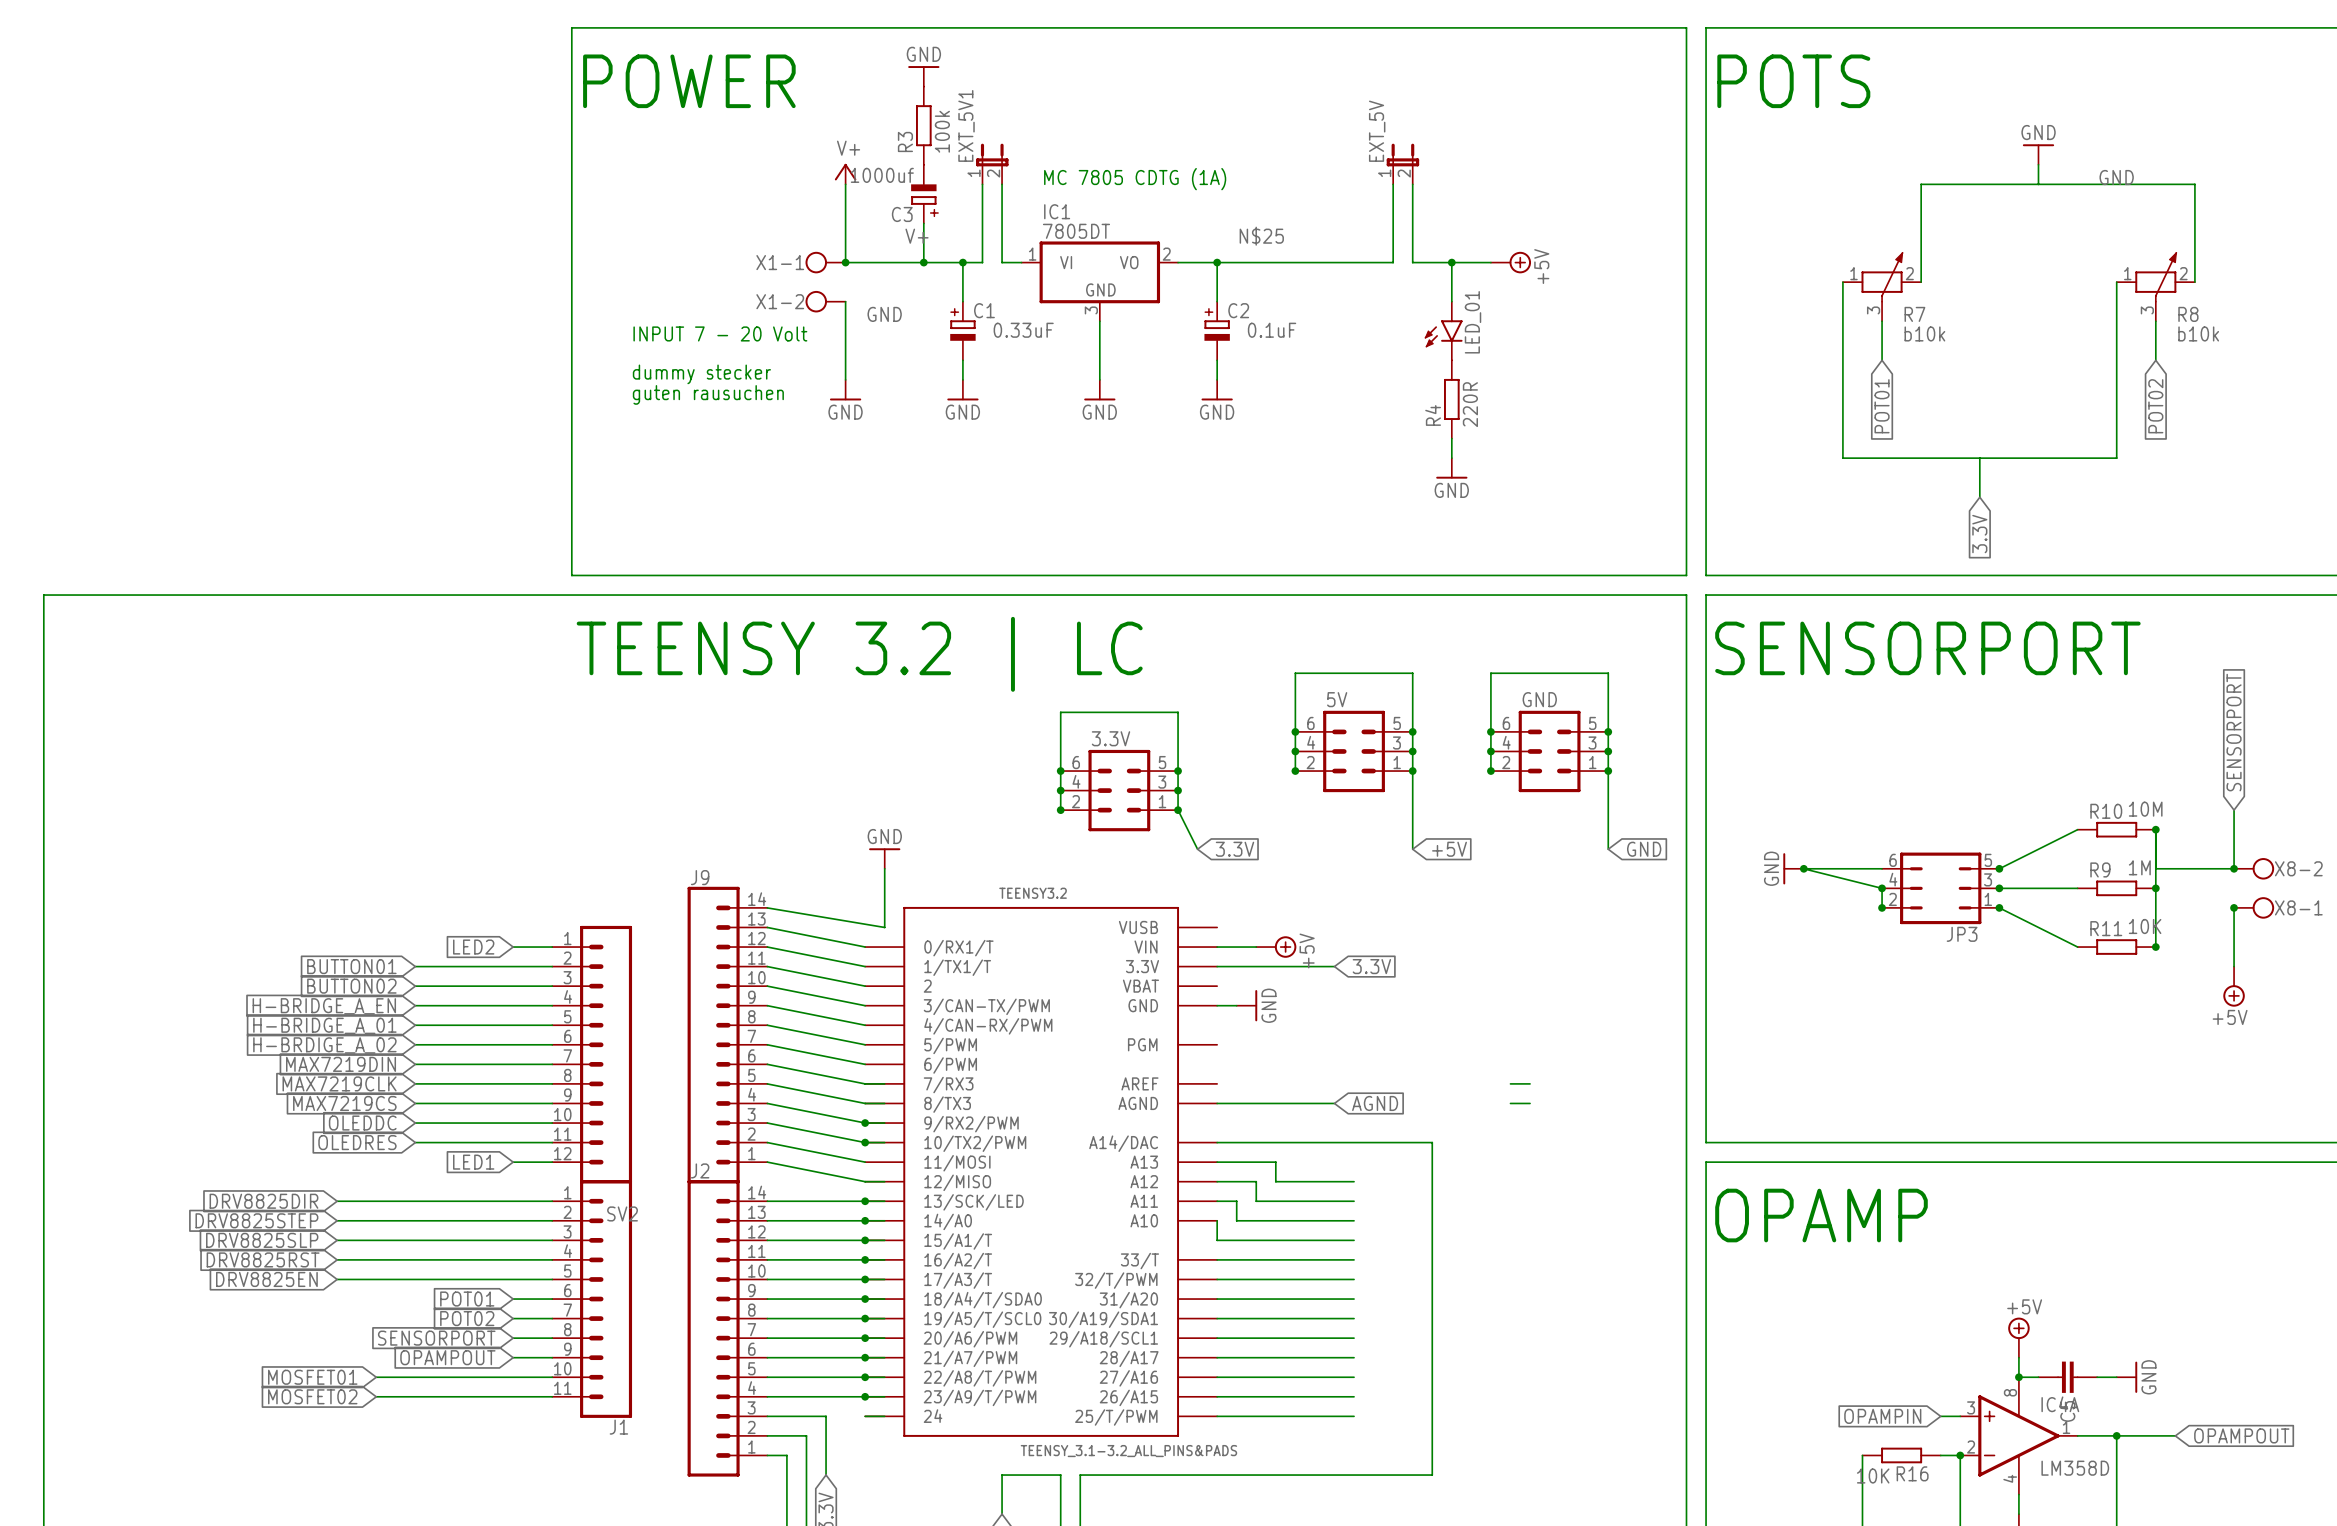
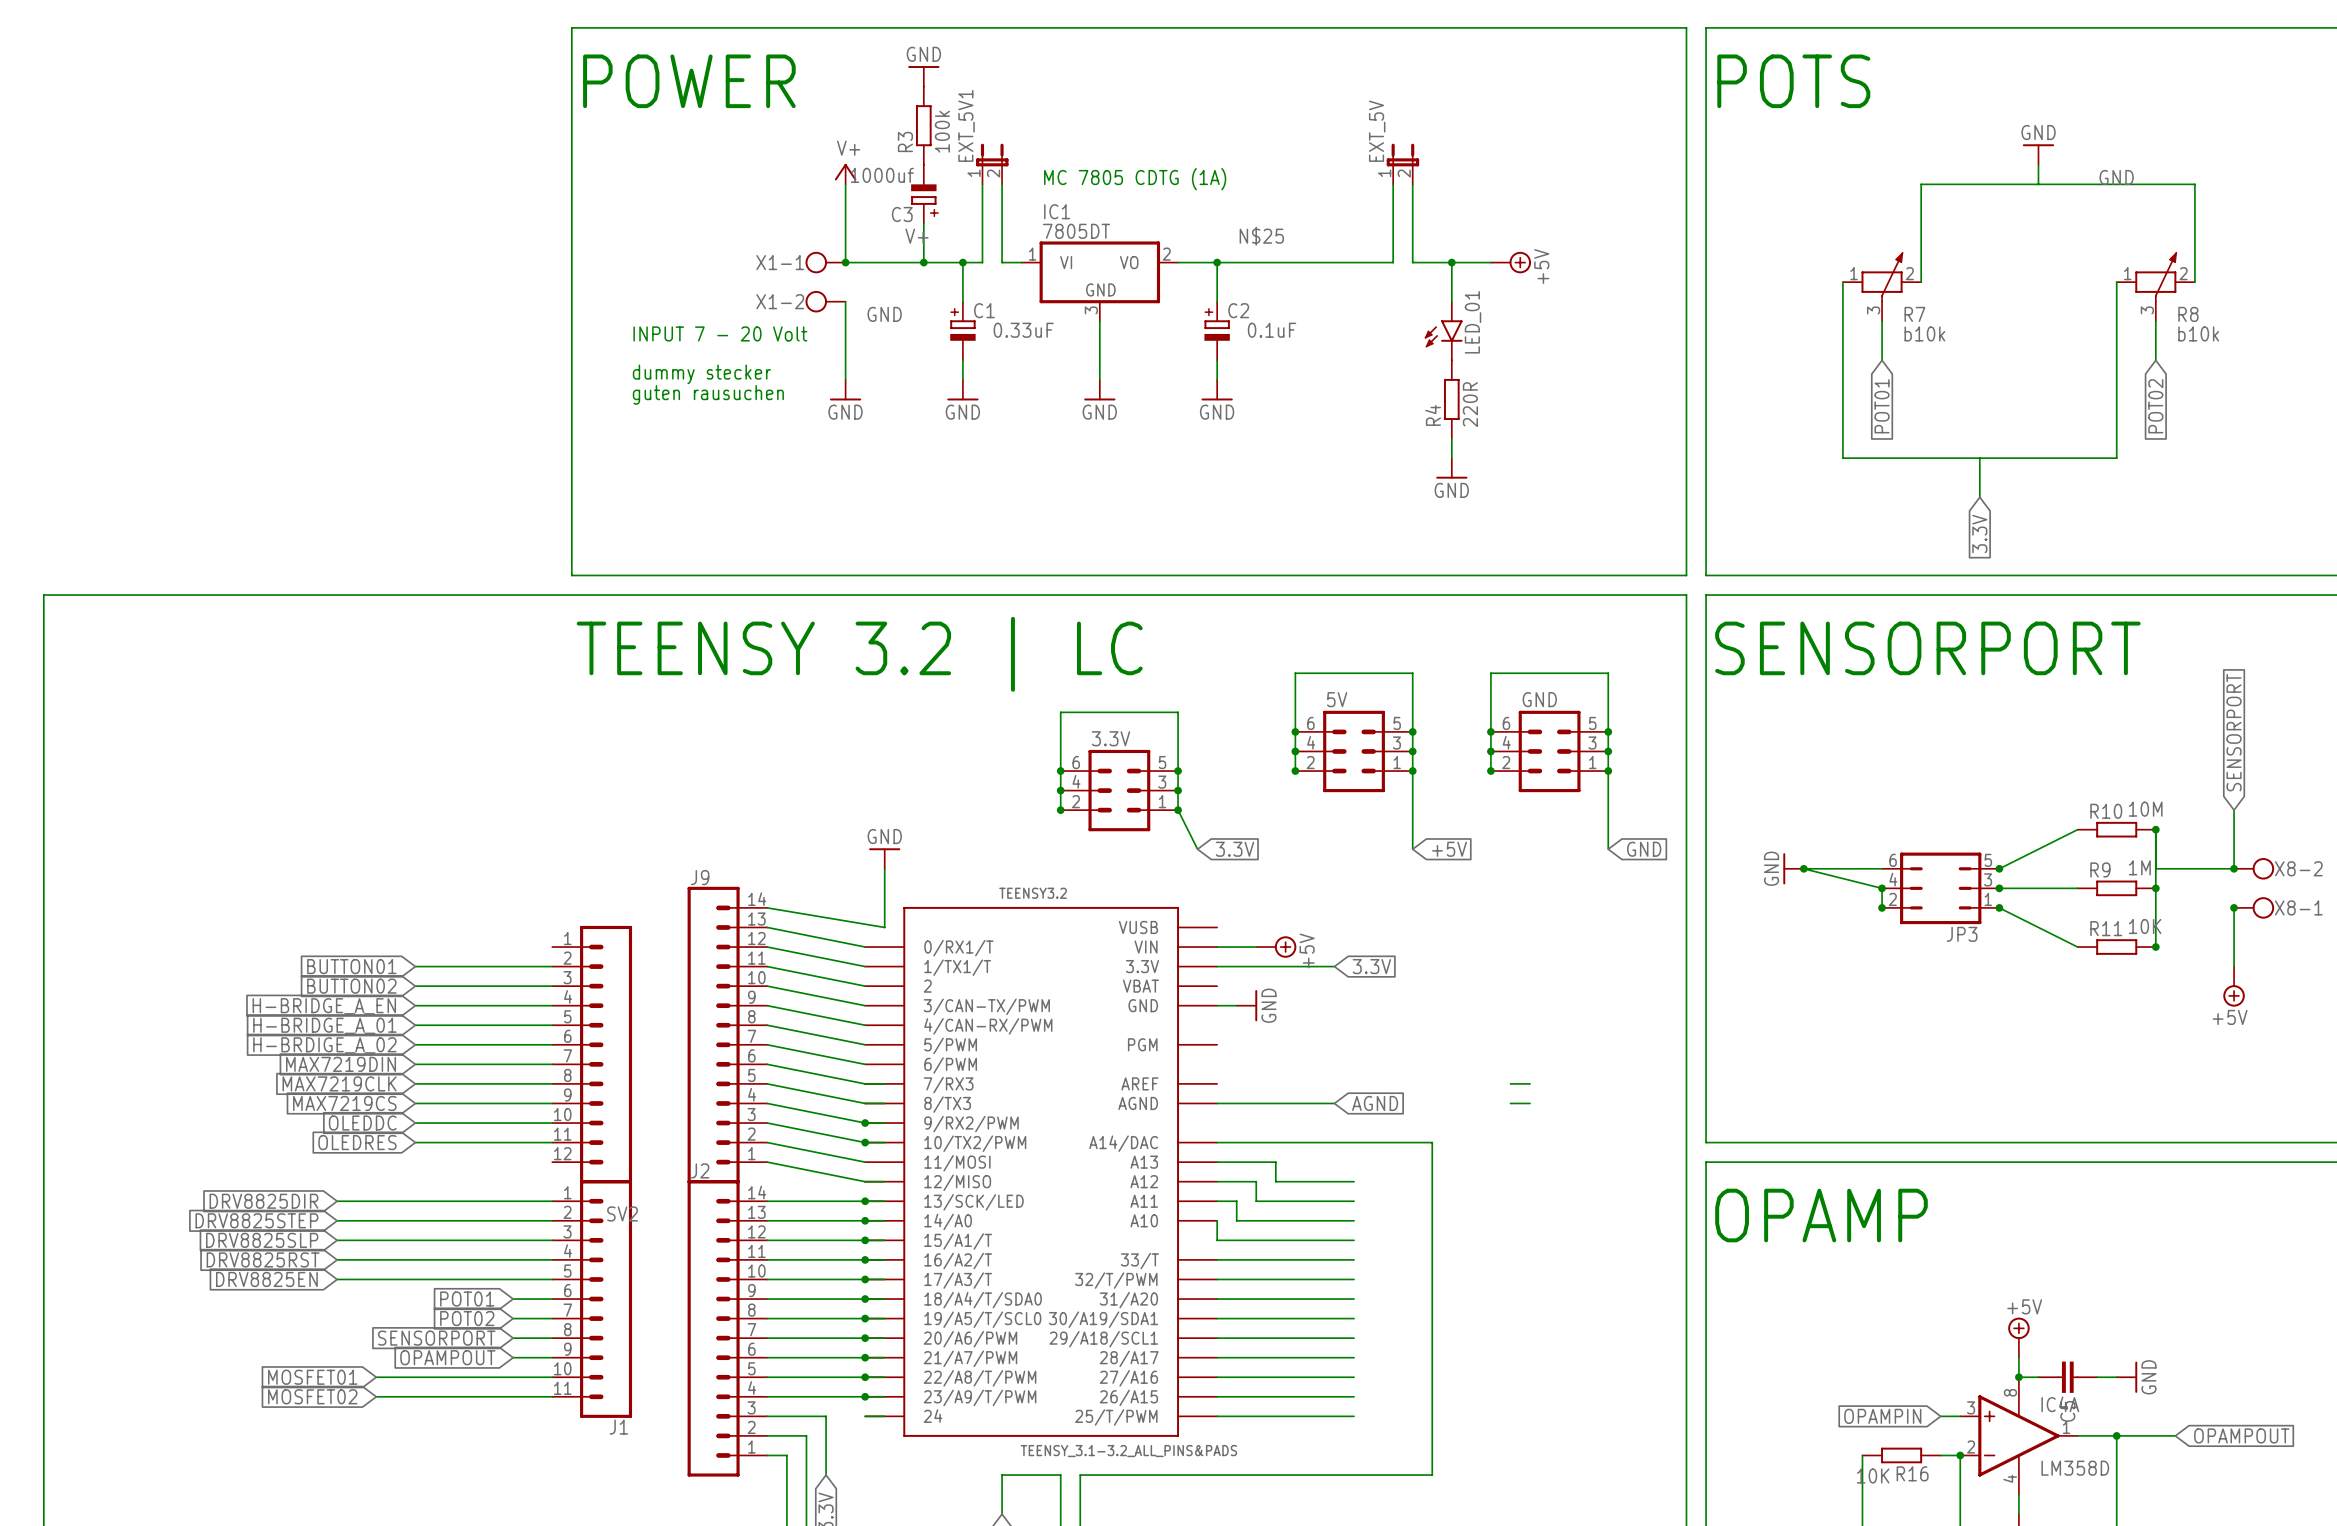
global label: LED2 (473, 947) -> none
wire: (513, 947) (552, 947) -> none
global label: LED1 (473, 1162) -> none
wire: (513, 1162) (552, 1162) -> none

